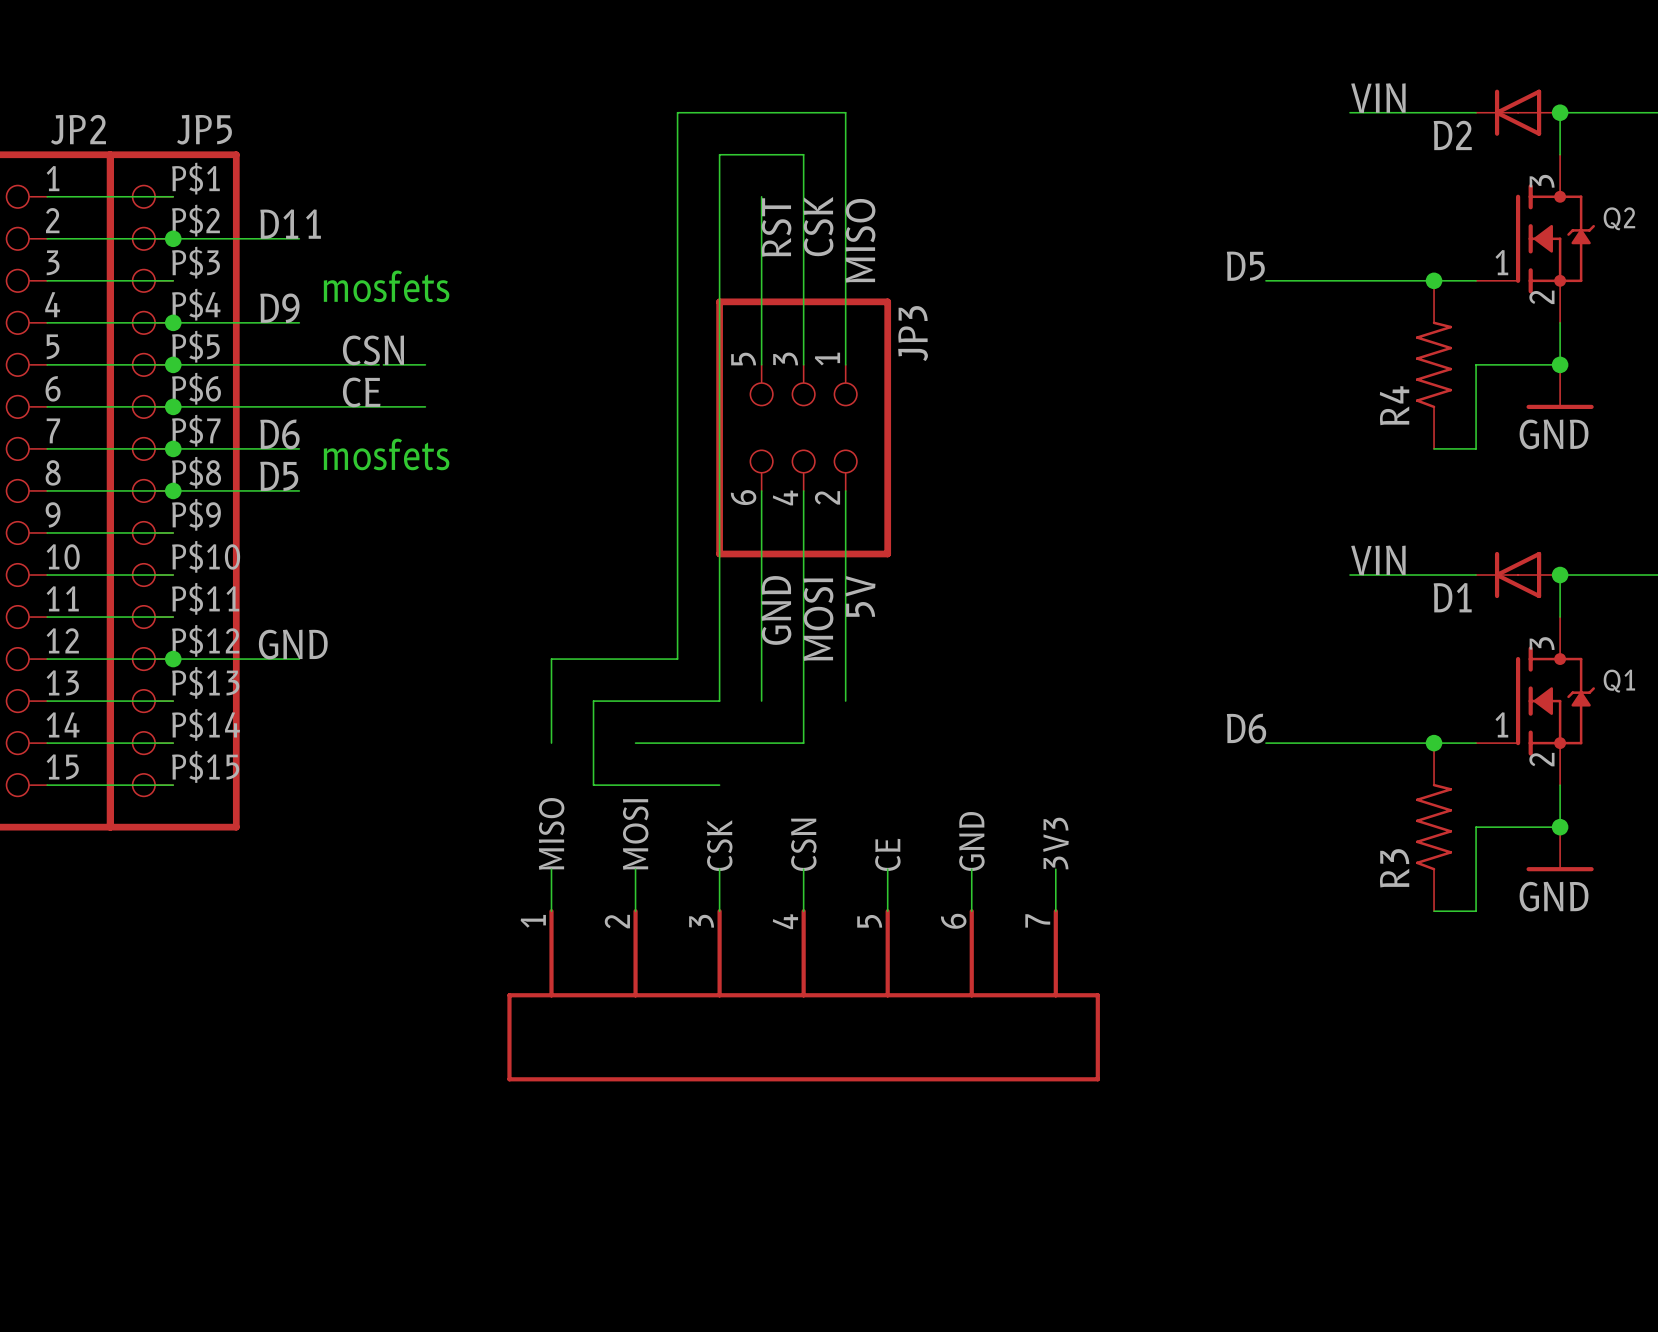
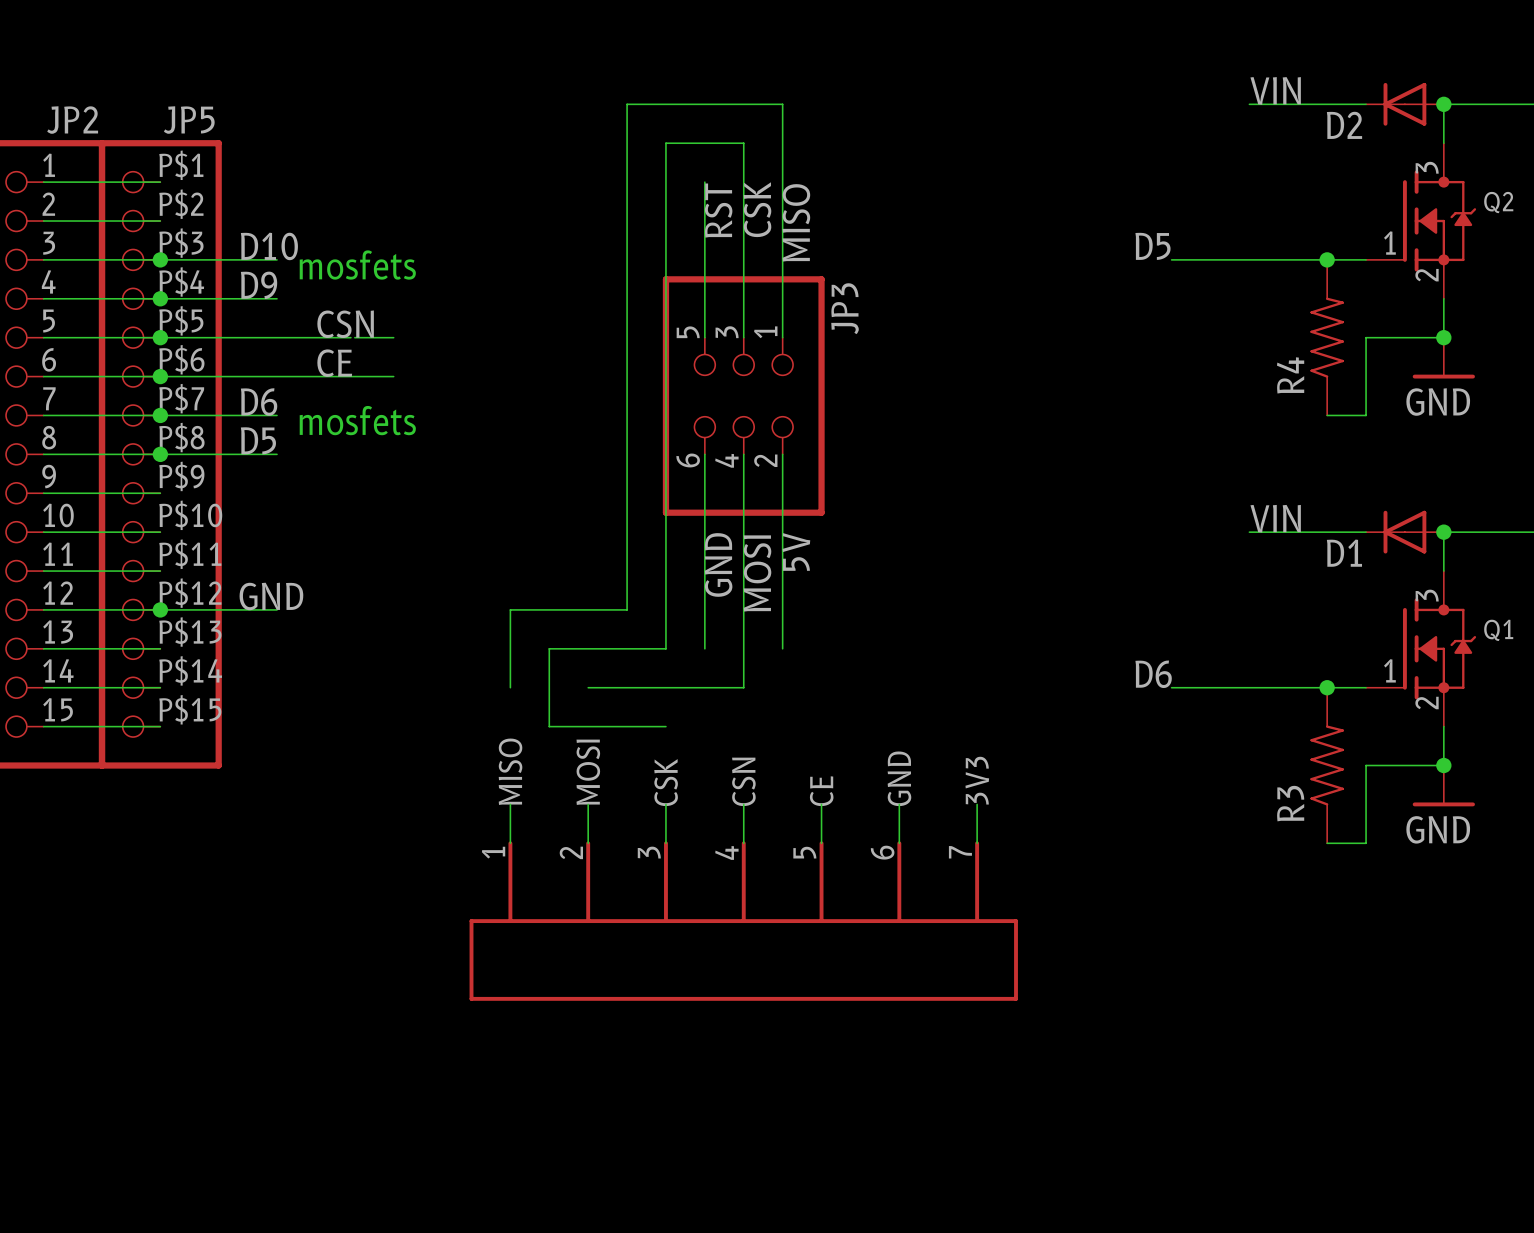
label: D11 (290, 224) -> D10 (269, 246)
wire: (173, 238) (299, 238) -> (160, 259) (277, 259)
junction position: (173, 238) -> (160, 259)

